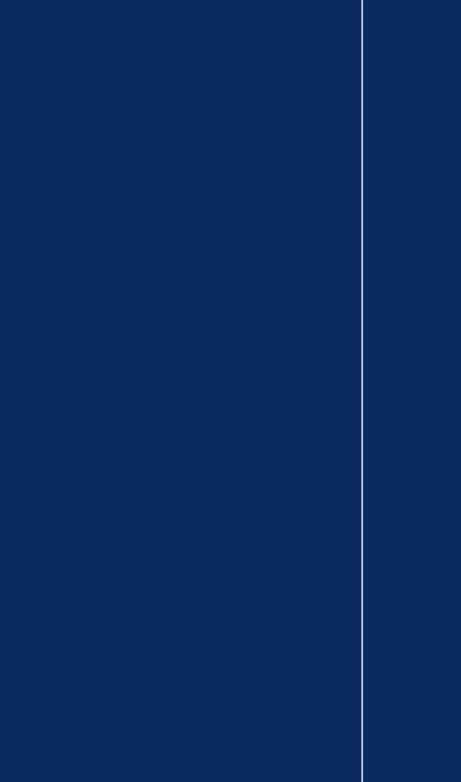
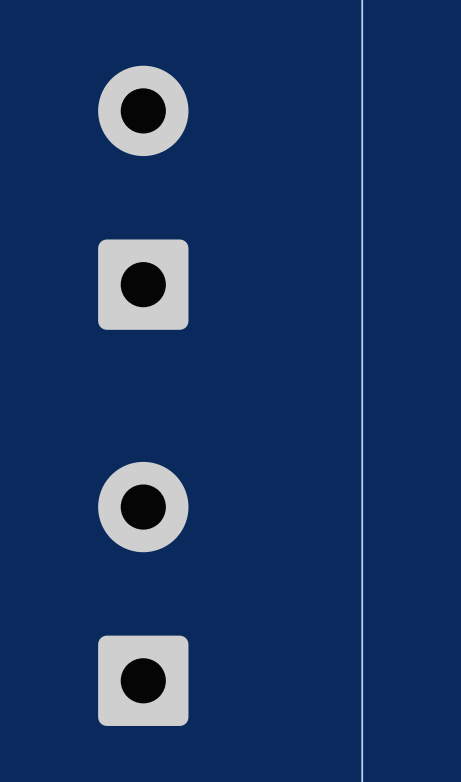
part: none -> (143, 197)
part: none -> (143, 593)

